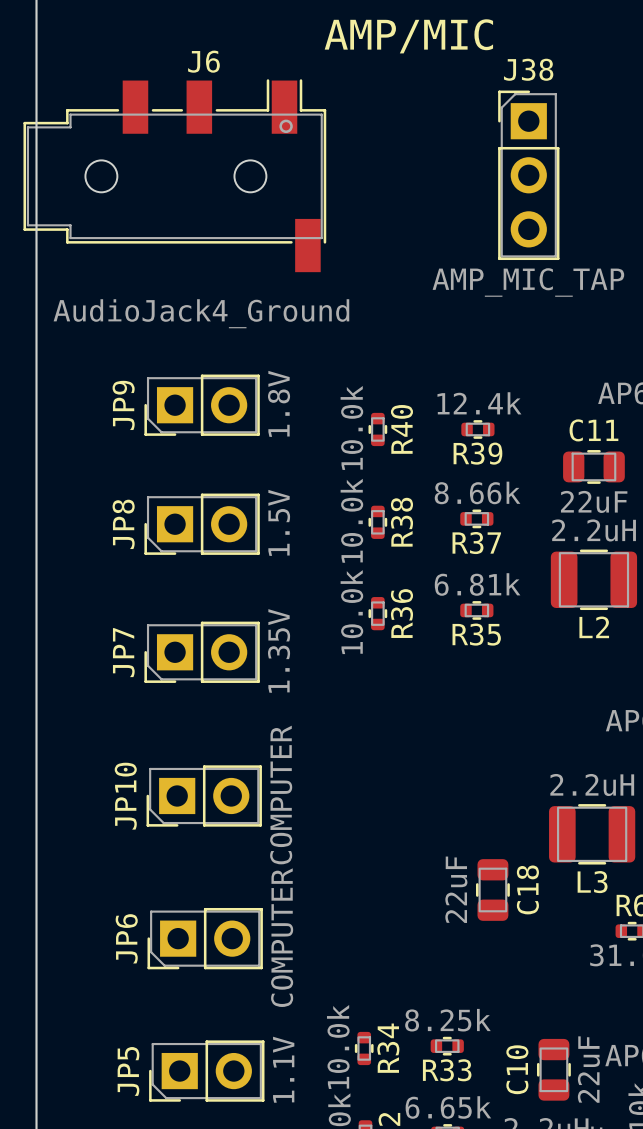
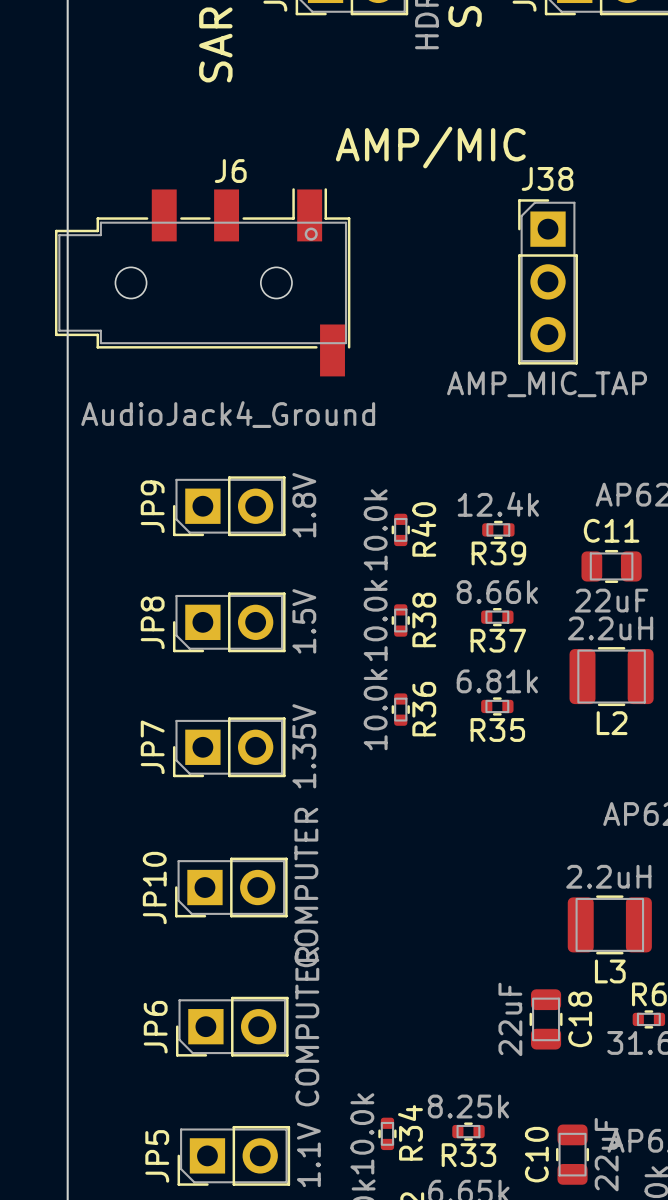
C18 position: (492, 889) -> (546, 1019)

